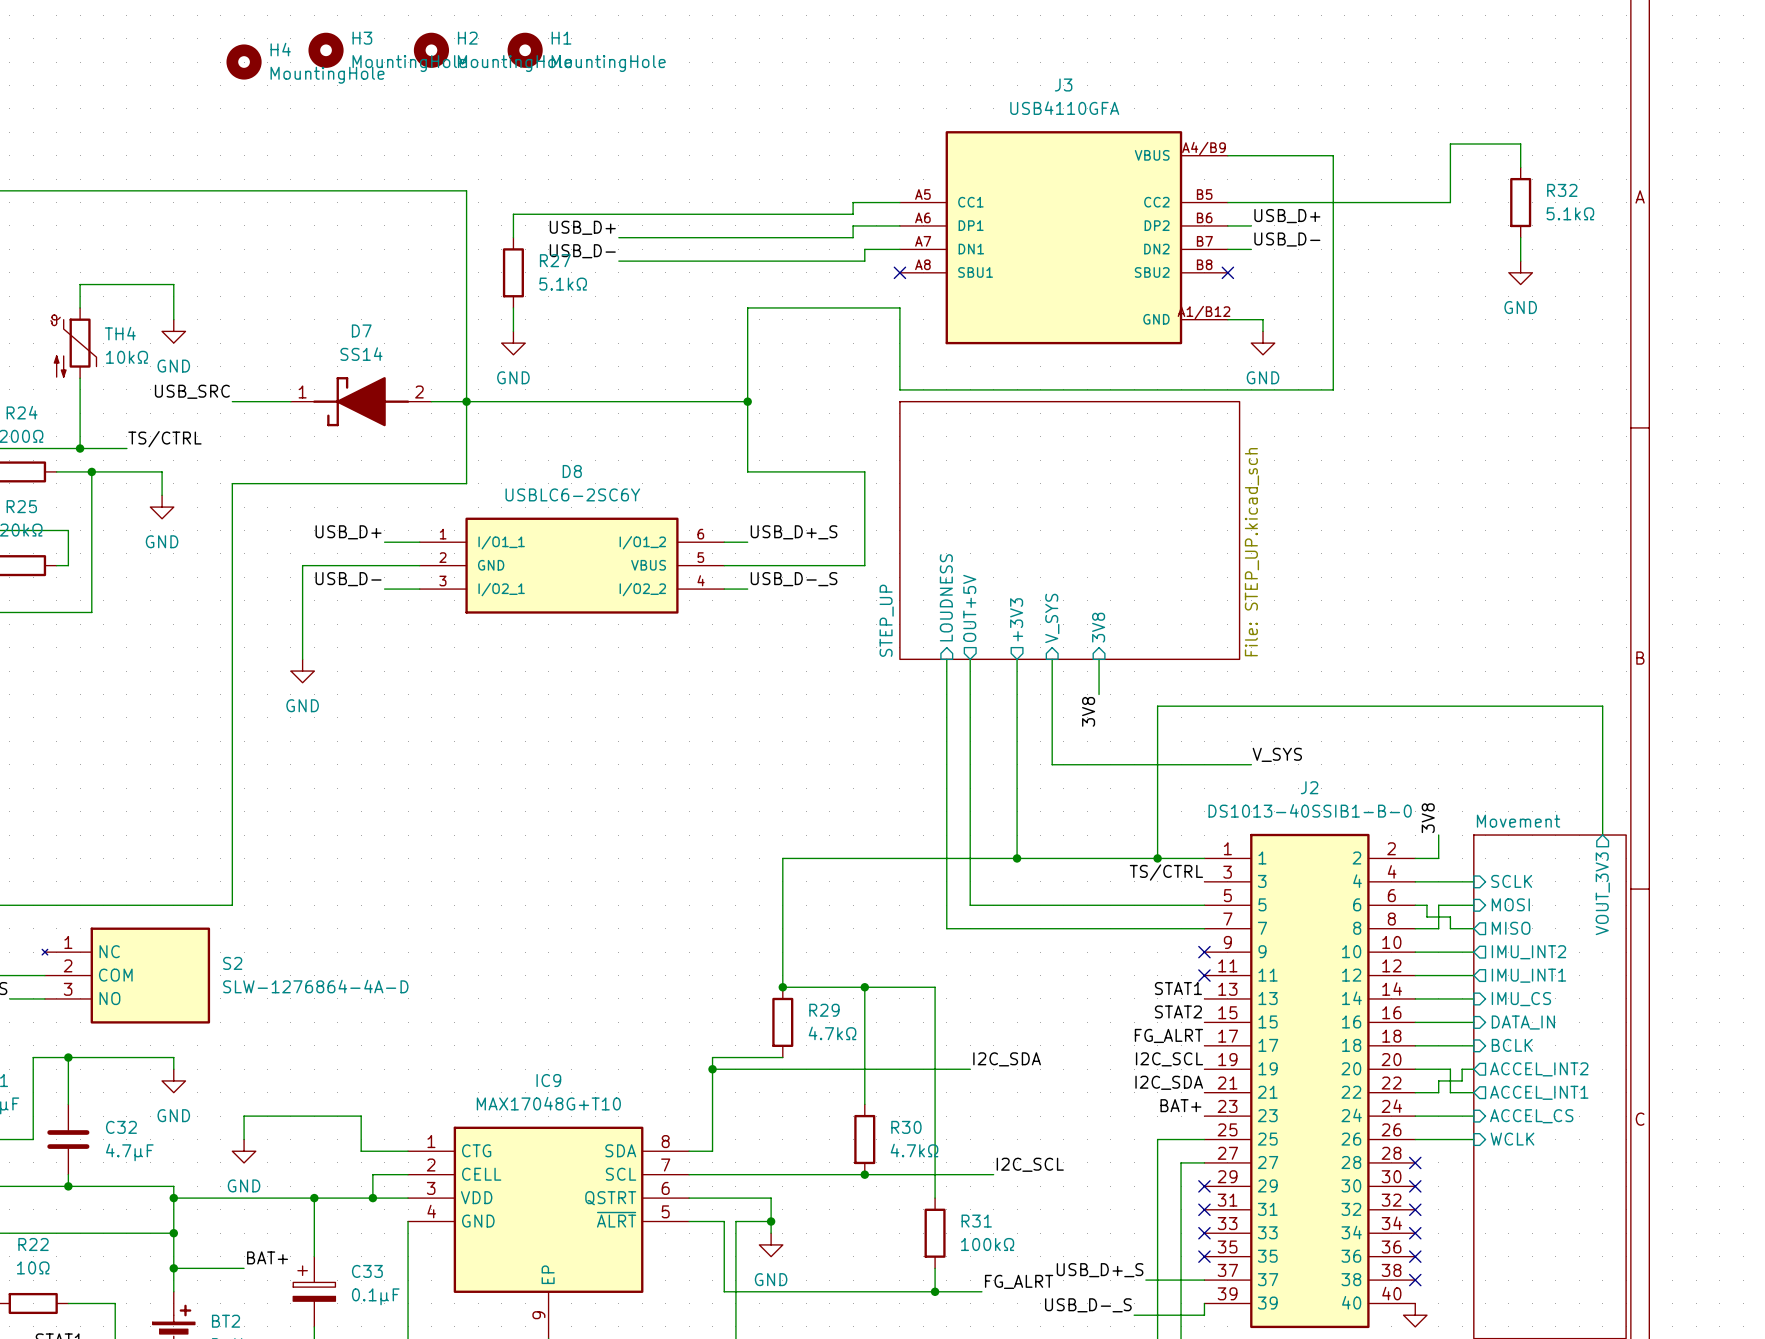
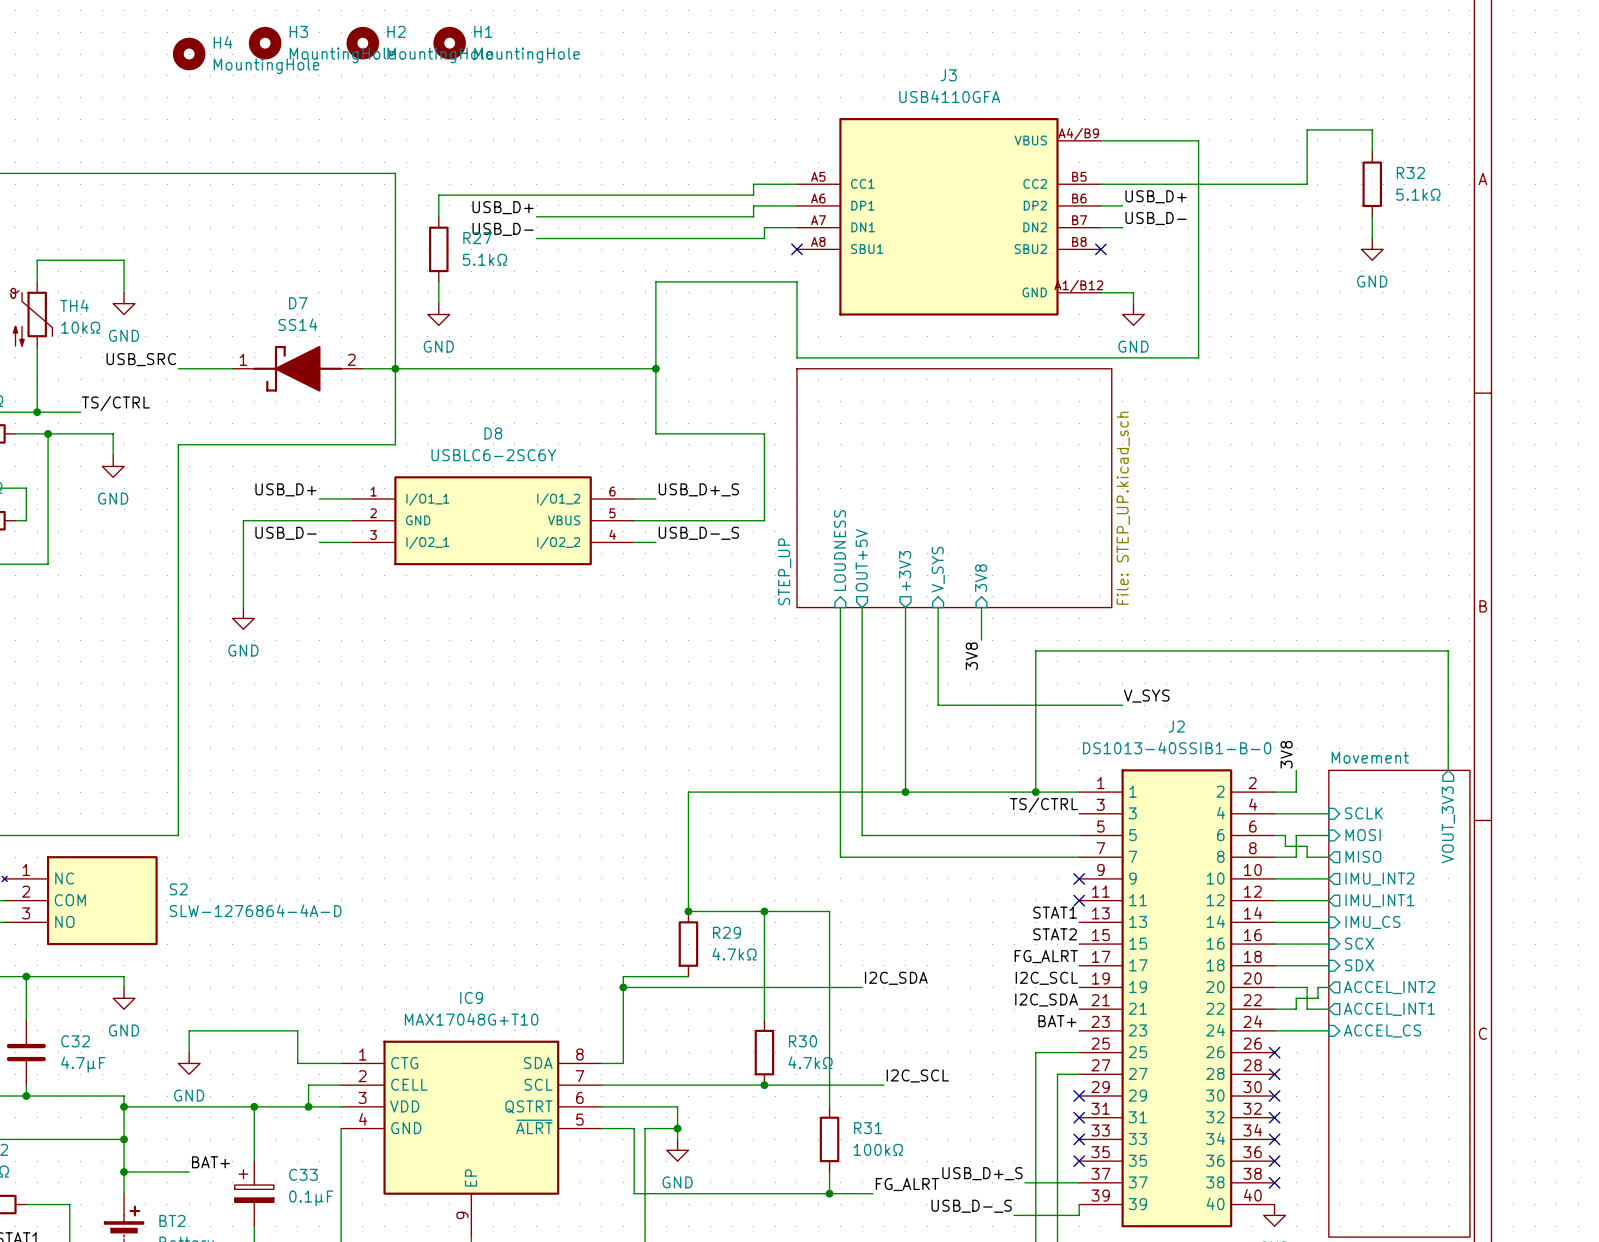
sheet pin: DATA_IN (1523, 1022) -> SCX (1359, 943)
sheet pin: BCLK (1512, 1045) -> SDX (1359, 965)
wire: (1415, 1139) (1473, 1139) -> none
no-connect mark: none -> (1274, 1052)
sheet pin: WCLK (1512, 1139) -> none

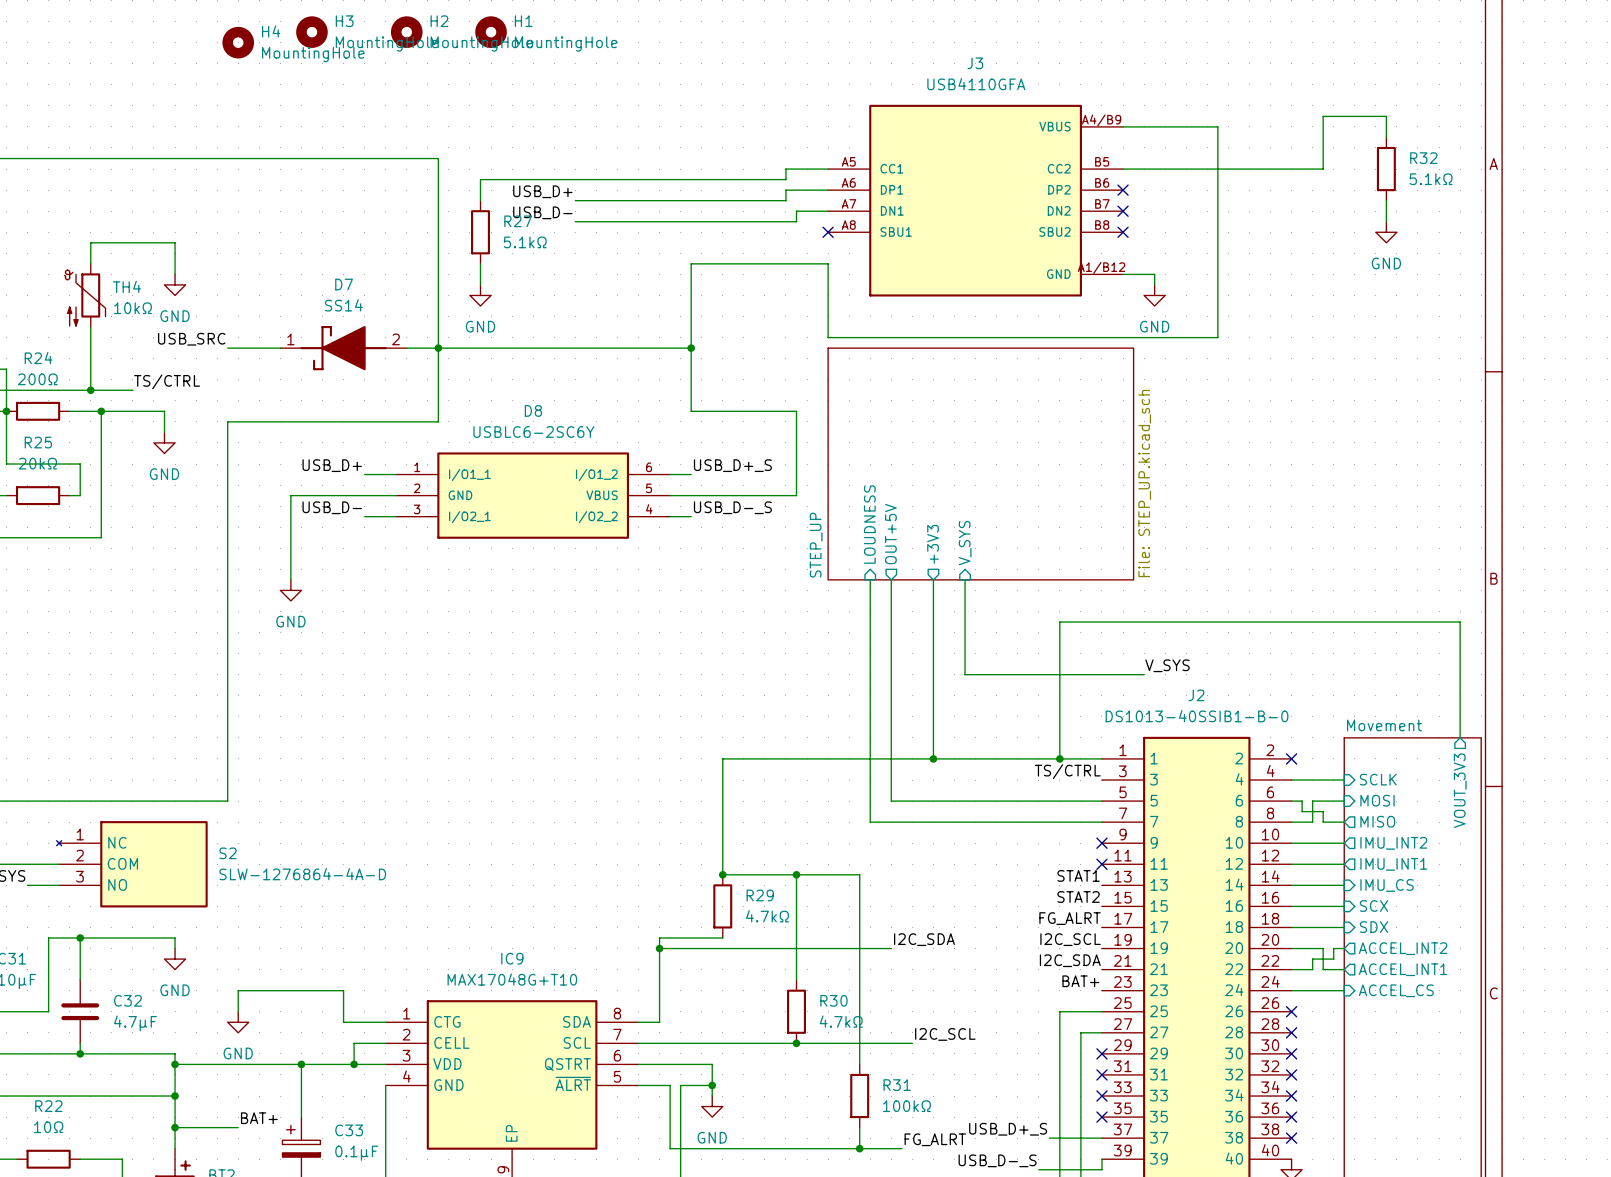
label: USB_D+ (1156, 196) -> none
wire: (1100, 205) (1122, 205) -> none
no-connect mark: none -> (1123, 190)
label: USB_D- (1156, 218) -> none
wire: (1100, 227) (1122, 227) -> none
no-connect mark: none -> (1123, 211)
sheet pin: 3V8 (981, 578) -> none
wire: (981, 607) (981, 640) -> none
label: 3V8 (971, 656) -> none
label: 3V8 (1286, 754) -> none
wire: (1296, 770) (1296, 792) (1274, 792) -> none
no-connect mark: none -> (1291, 758)

